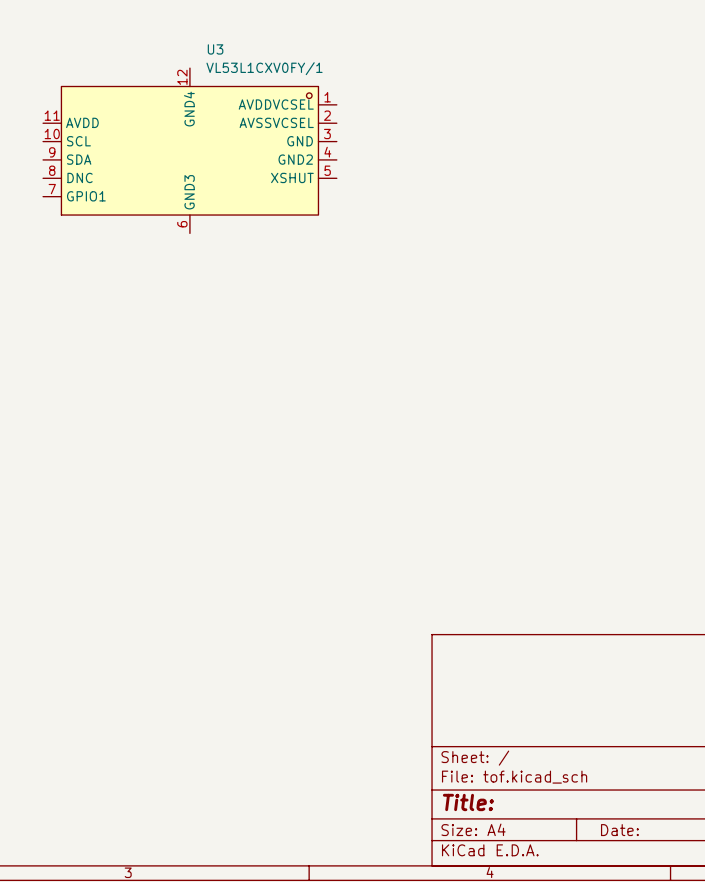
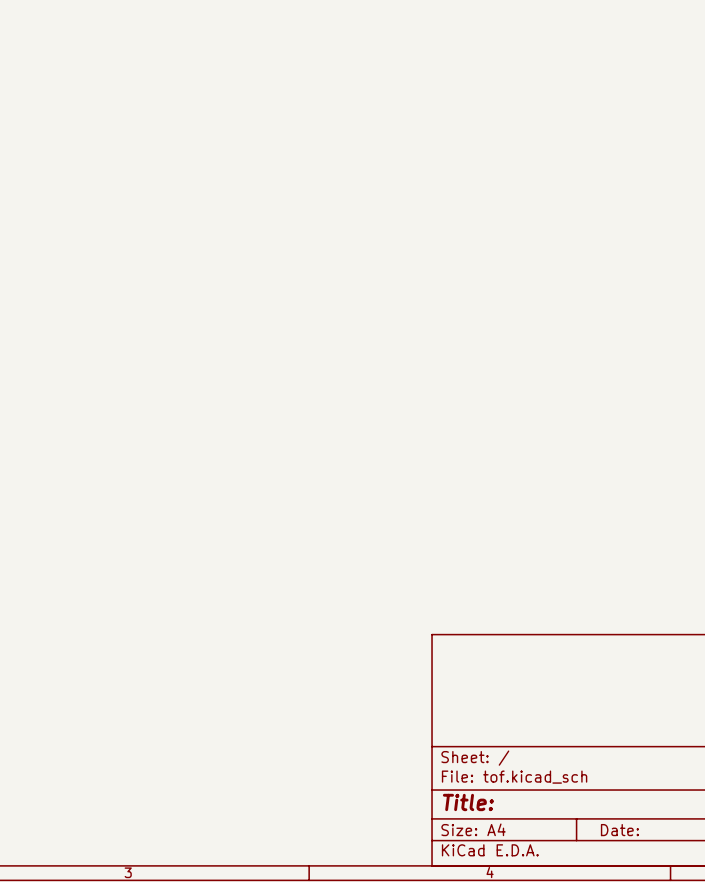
U3: VL53L1CXV0FY/1 (189, 150) -> none

